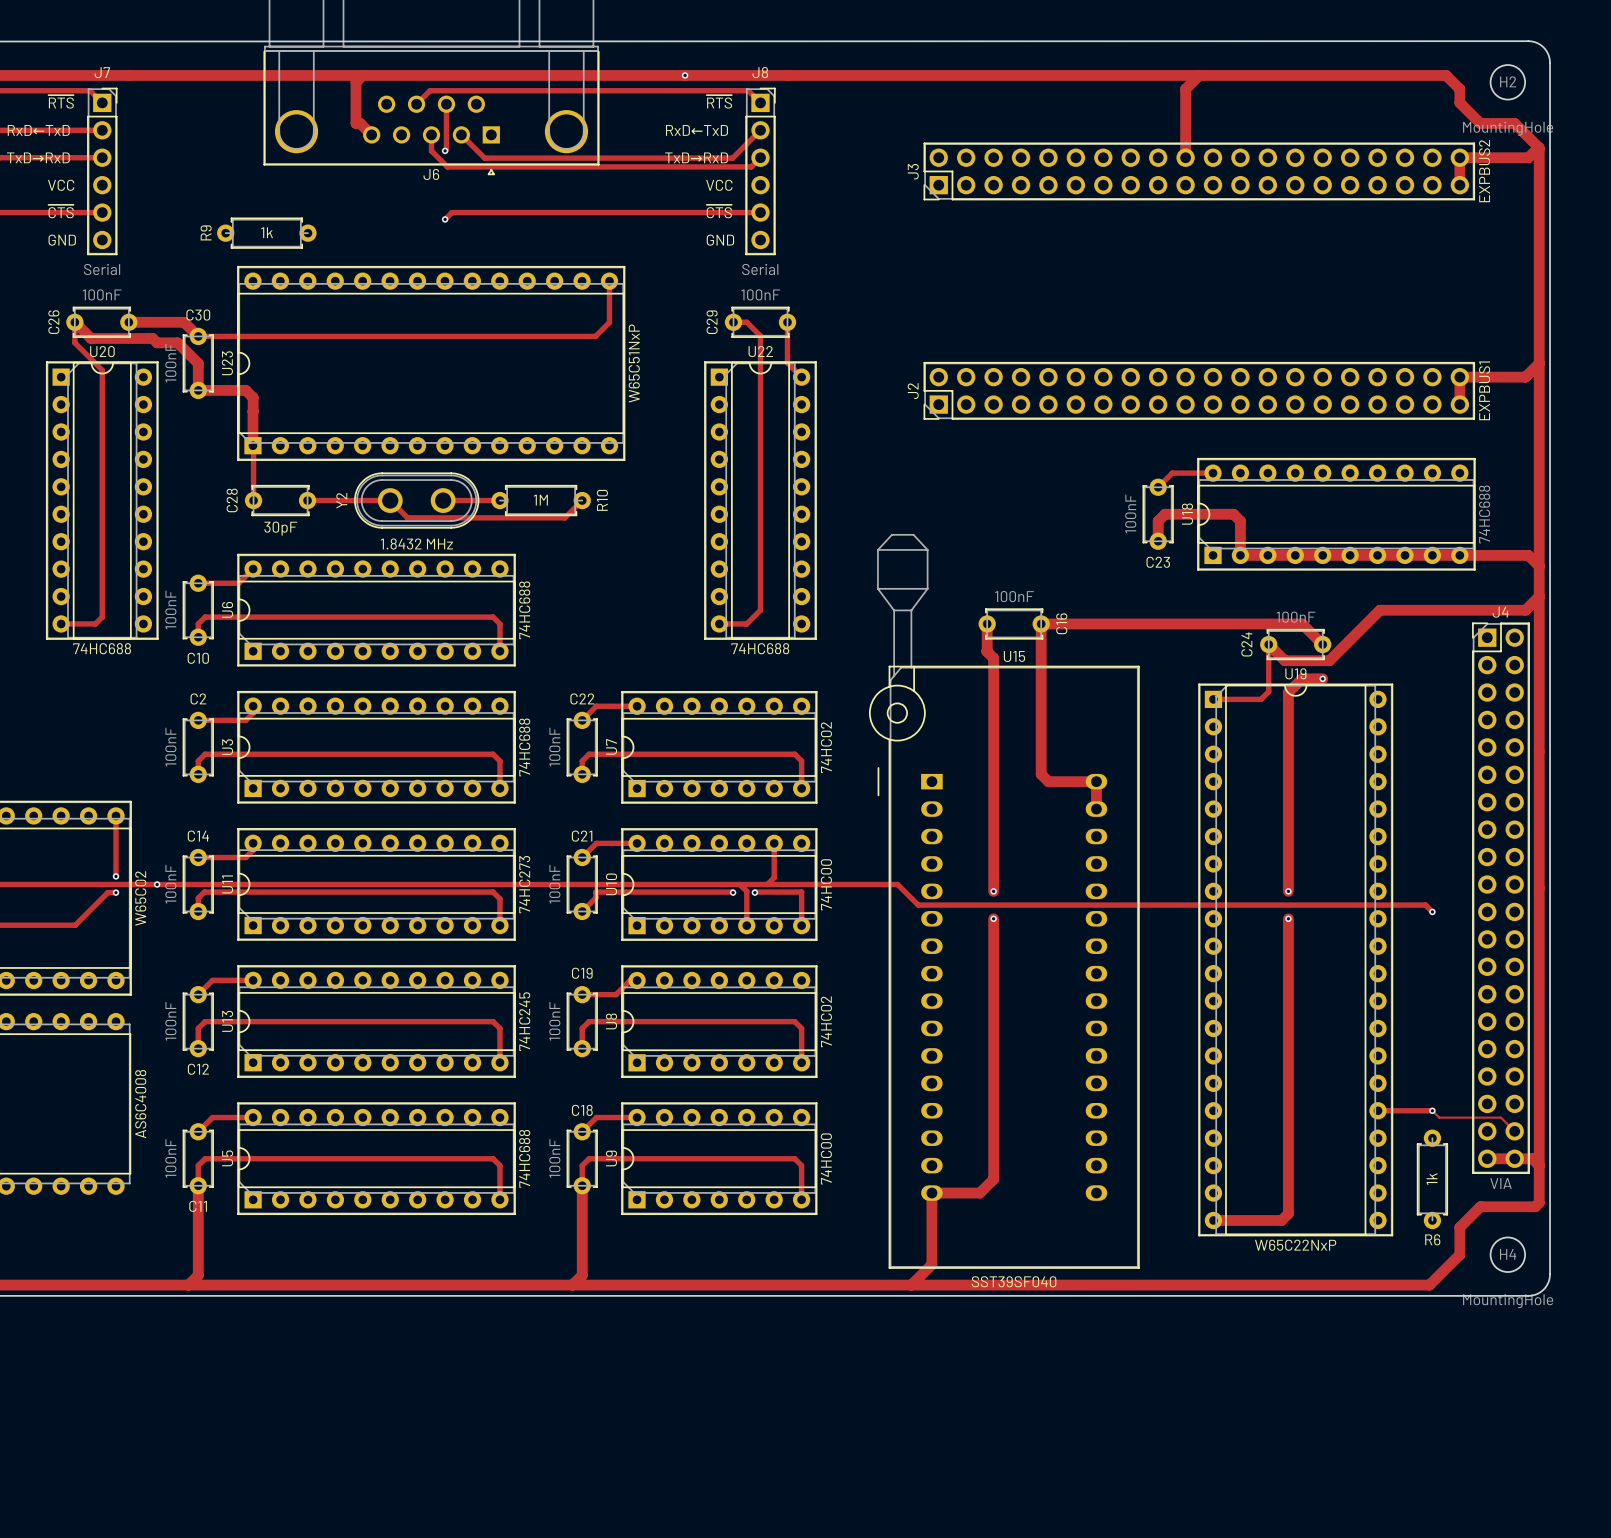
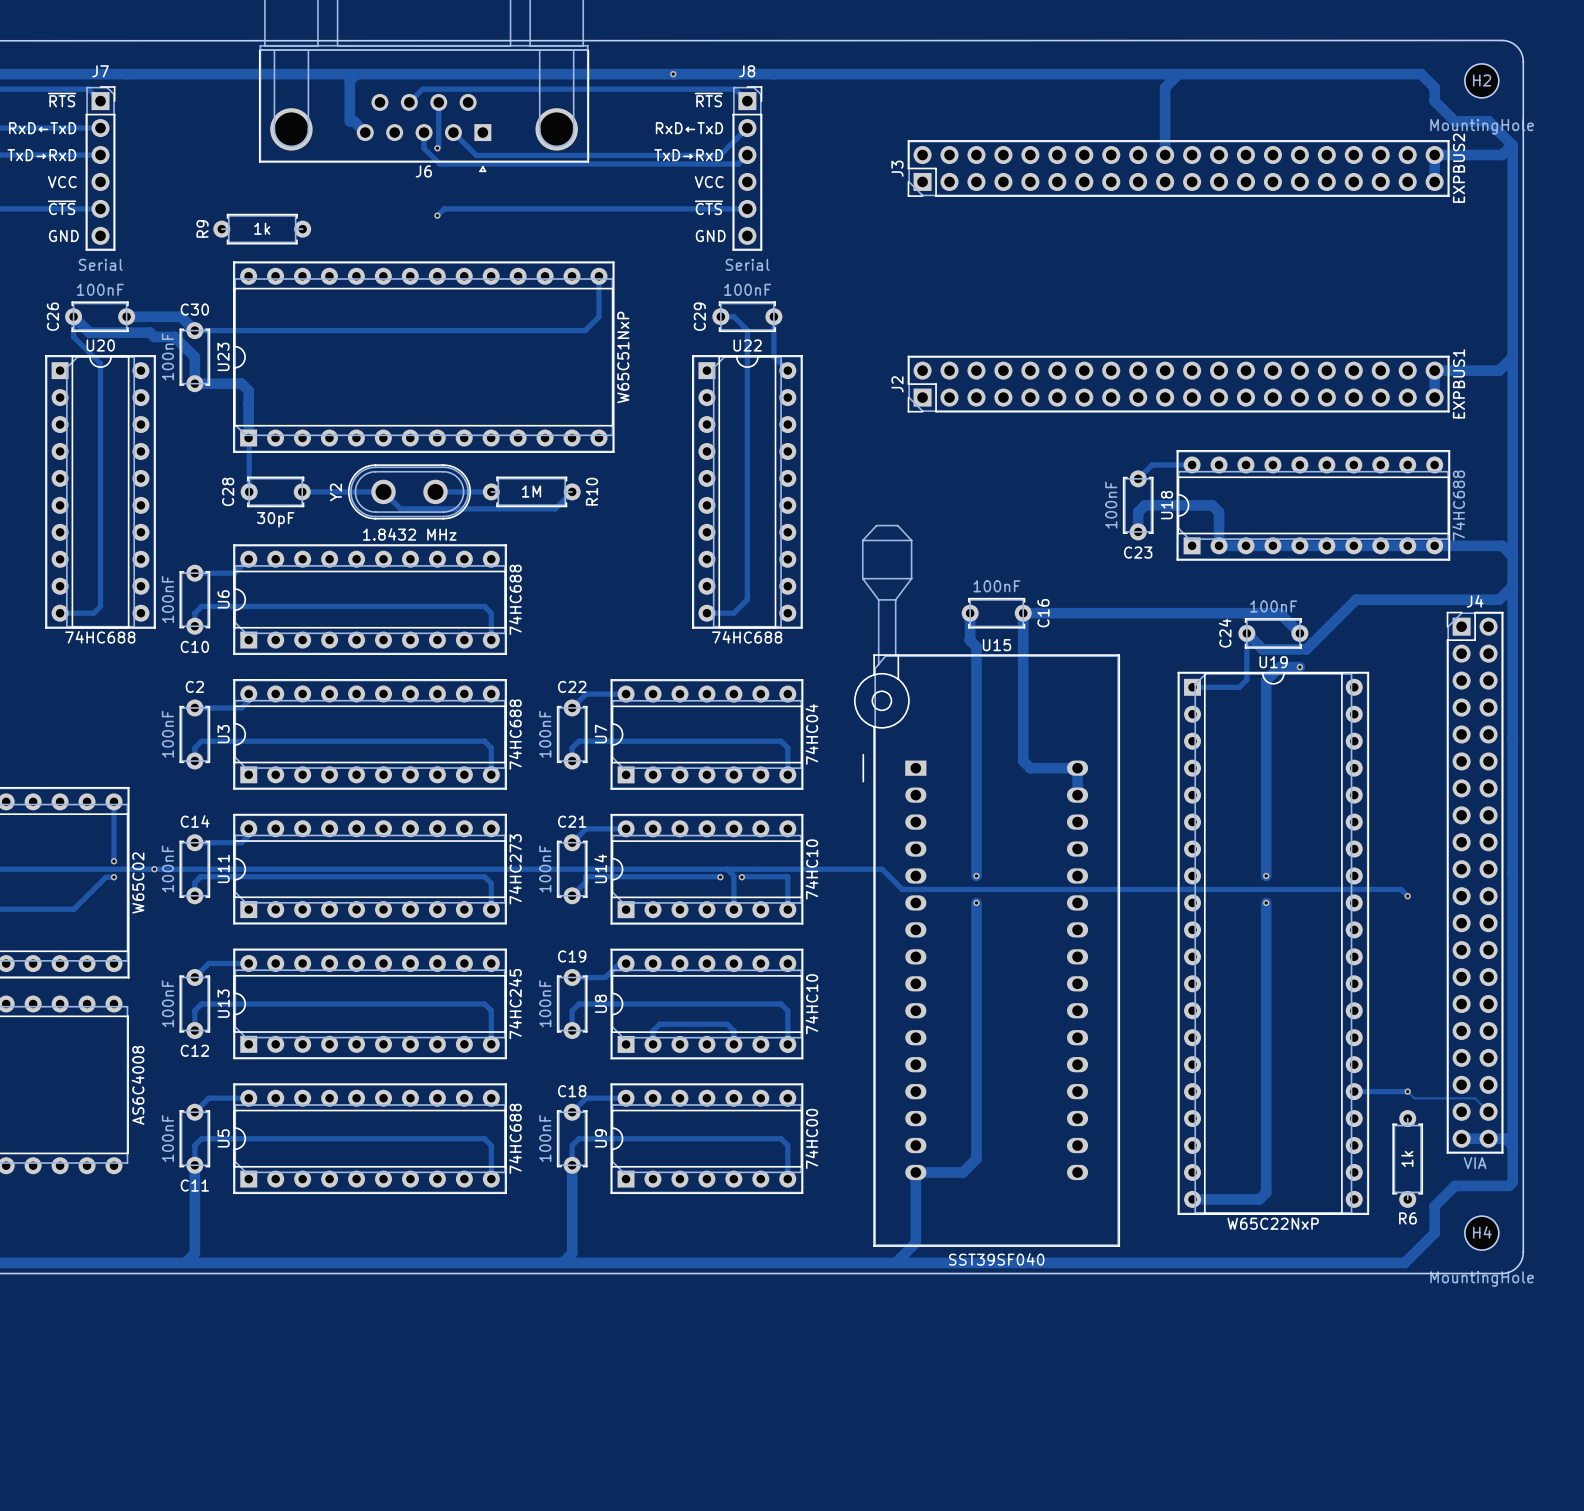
U7 value: 74HC02 (826, 747) -> 74HC04 (811, 734)
track: (774, 843) (774, 877) (767, 884) -> none
U10 name: U10 (611, 884) -> U14 (600, 868)
U10 value: 74HC00 (826, 884) -> 74HC10 (811, 869)
U8 value: 74HC02 (826, 1021) -> 74HC10 (811, 1004)
track: none -> (653, 1044) (653, 1030) (659, 1024) (727, 1024) (733, 1030) (733, 1044)

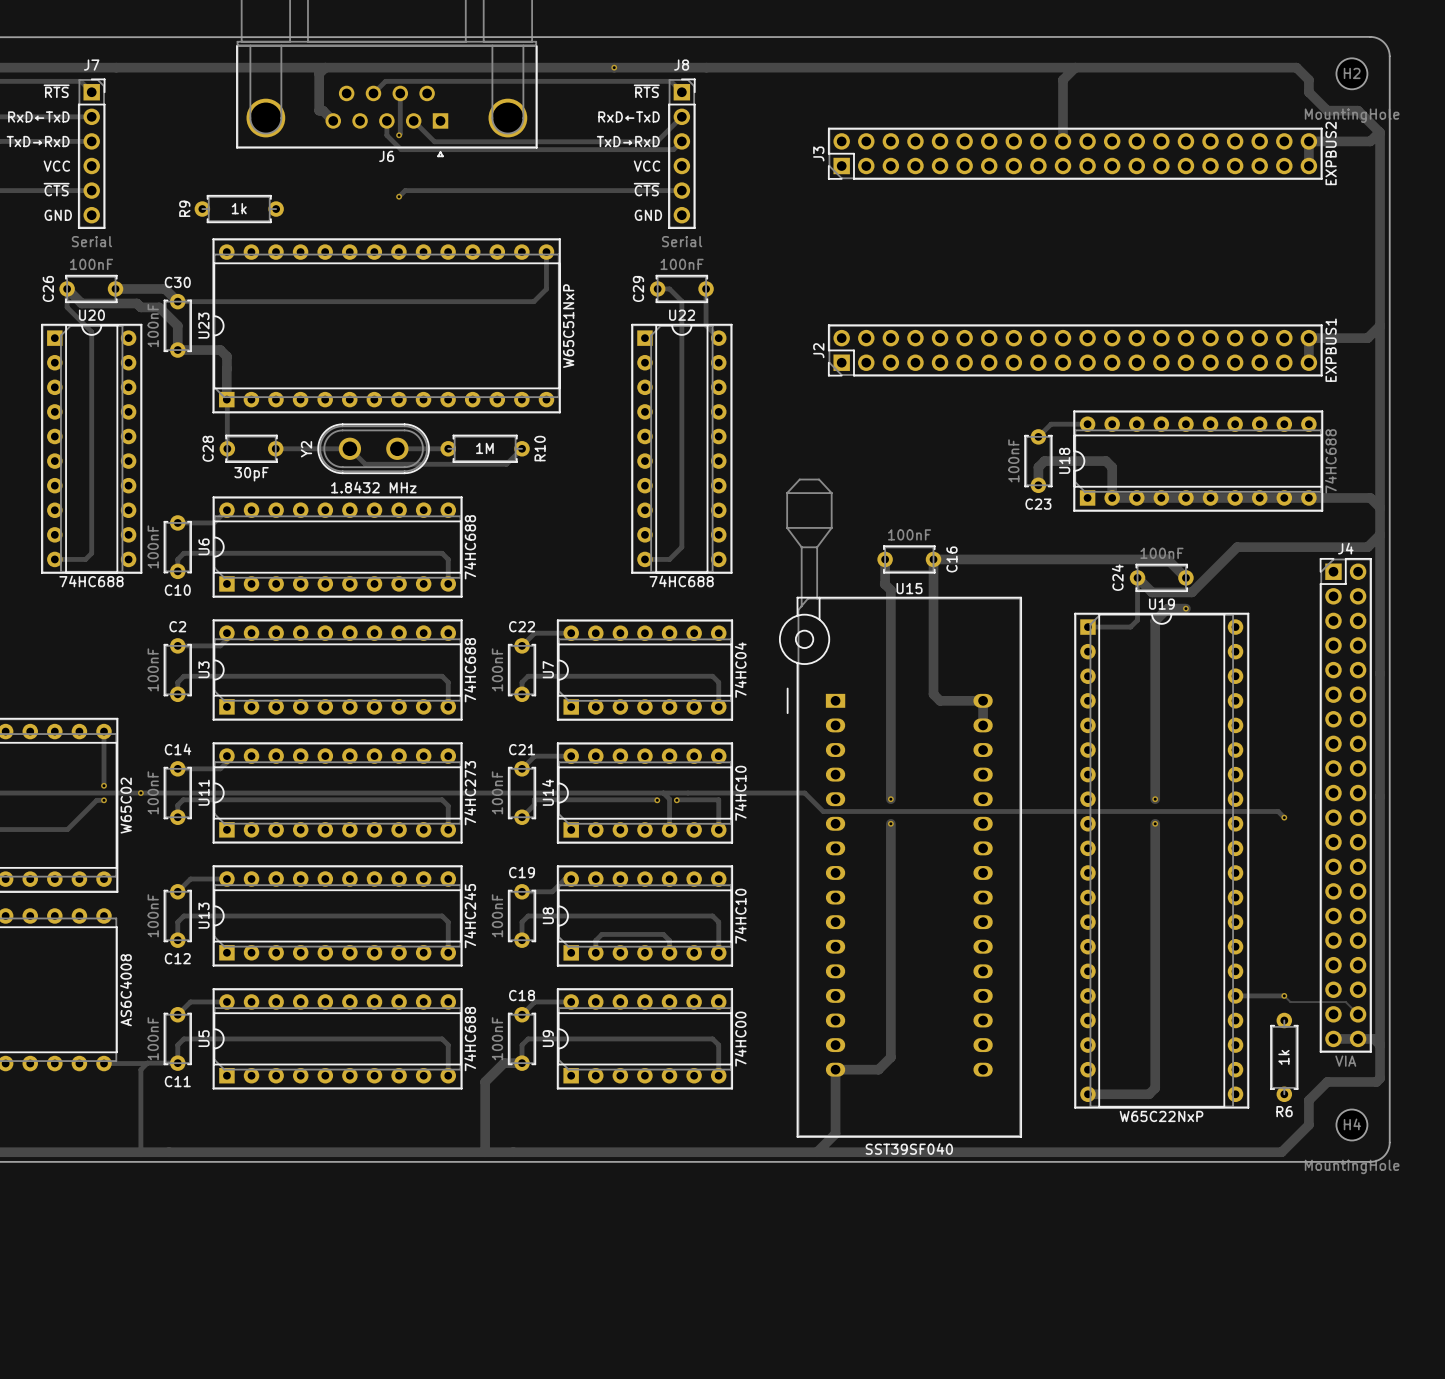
track: none -> (104, 1063) (147, 1063)
track: (194, 1165) (194, 1253) (185, 1262) -> (177, 1063) (147, 1063) (140, 1069) (140, 1152)
track: (572, 1165) (572, 1253) (562, 1262) -> (522, 1063) (503, 1063) (485, 1081) (485, 1152)

